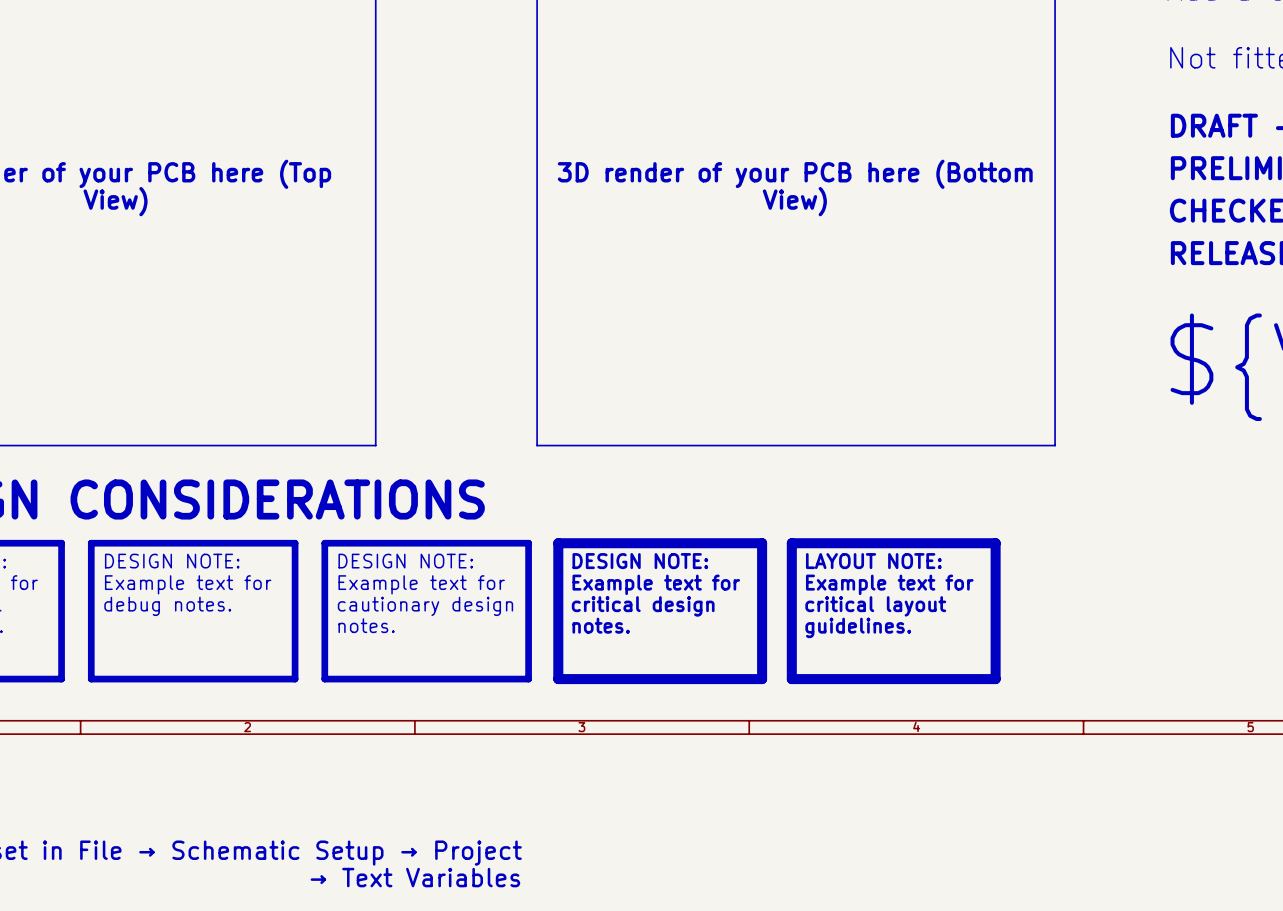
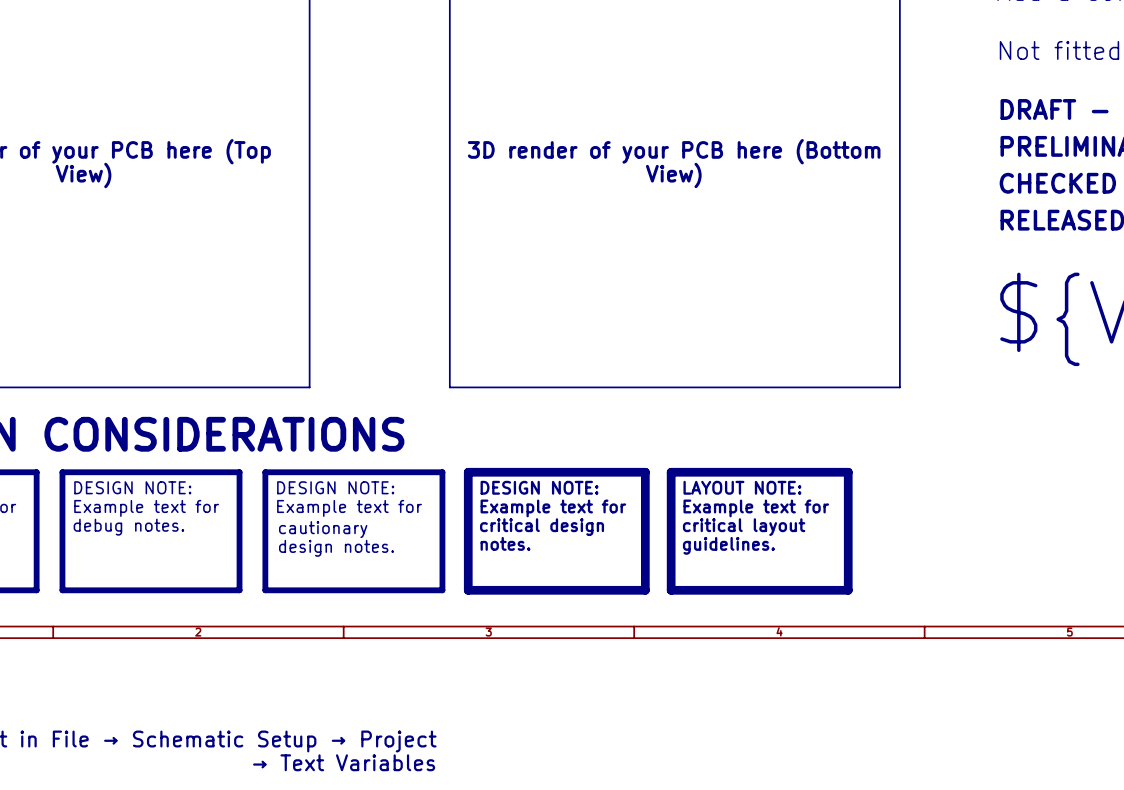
text: cautionary design (425, 606) -> cautionary (323, 529)
text: notes. (366, 625) -> design notes. (336, 548)

